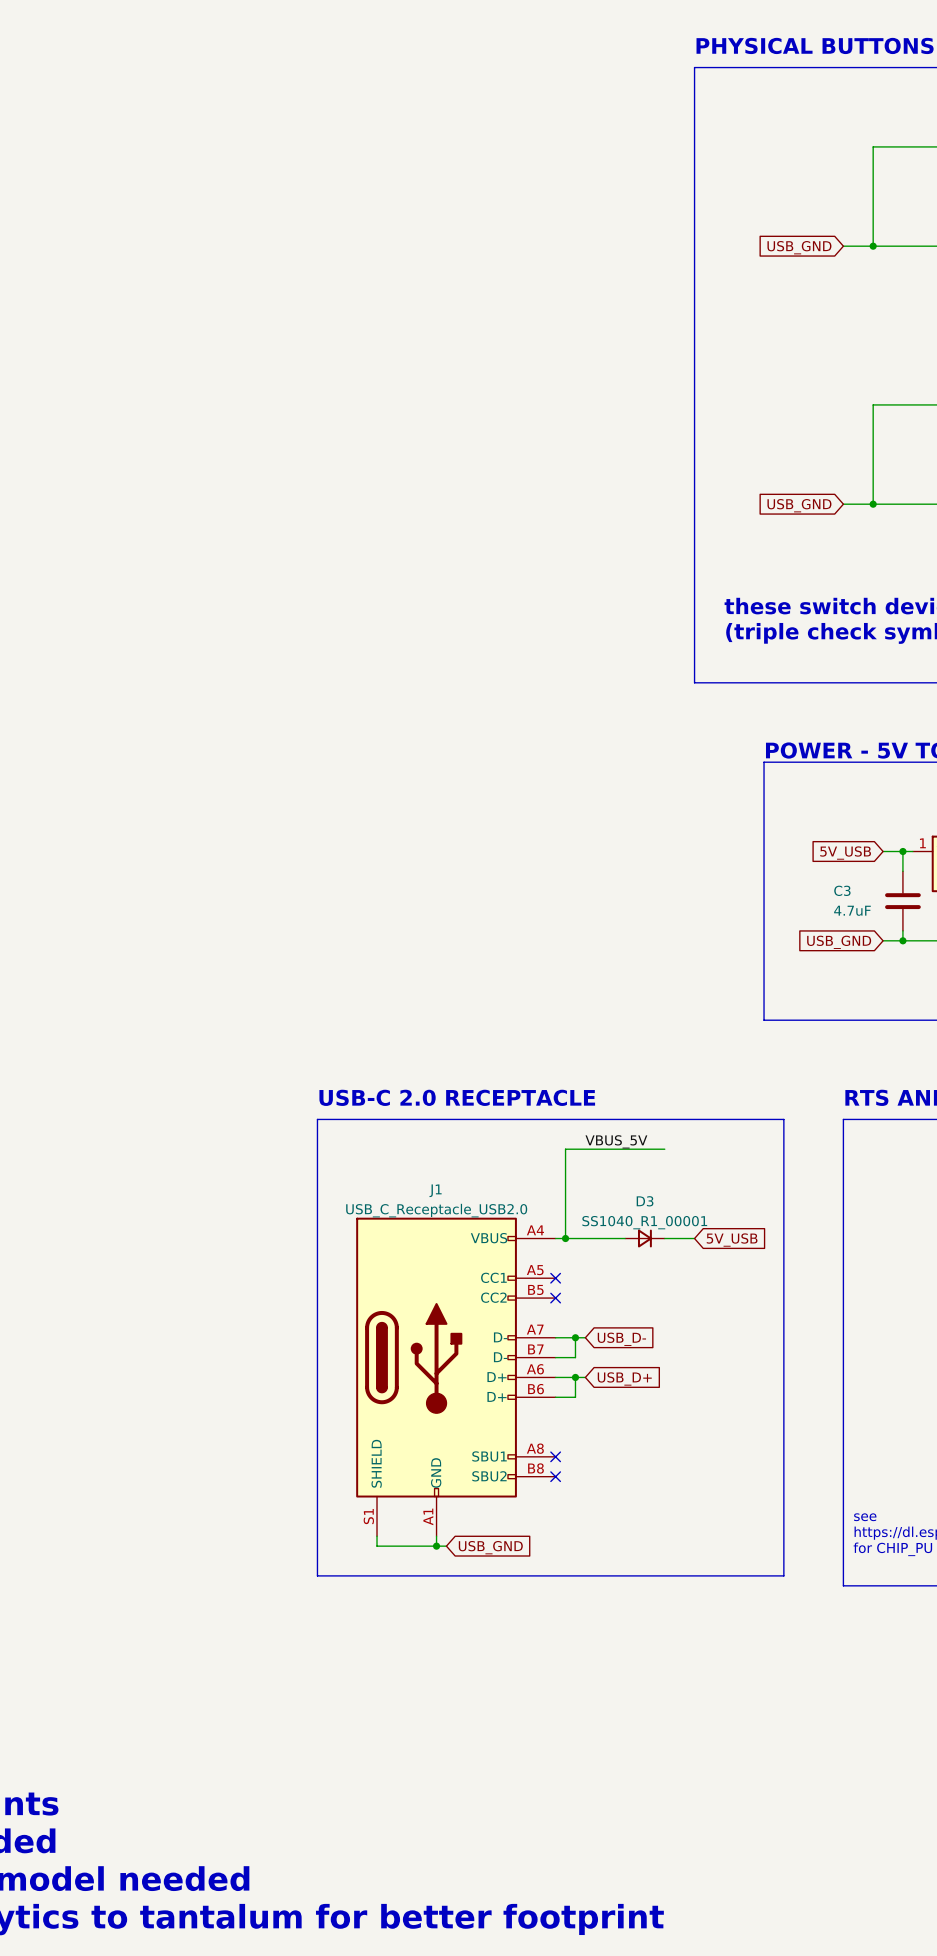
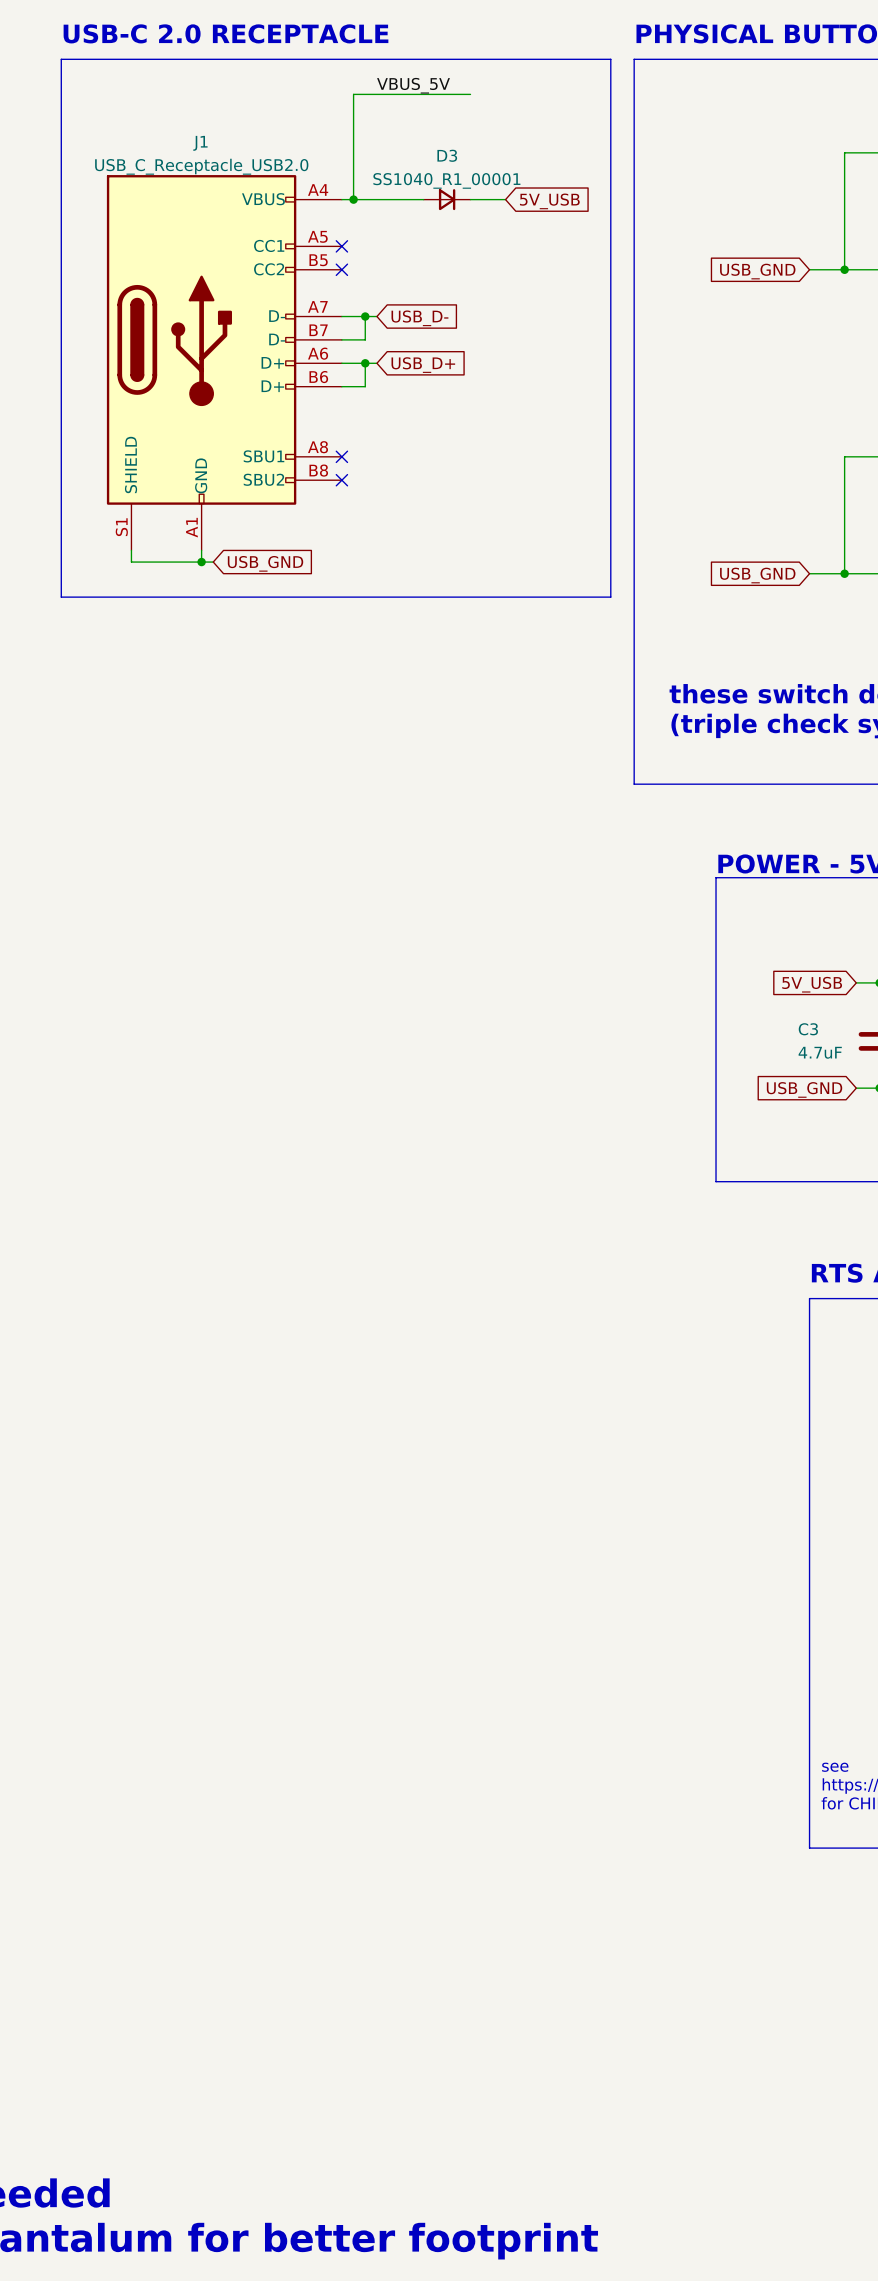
text: none -> USB-C 2.0 RECEPTACLE (225, 33)
line: none -> (61, 59) (610, 59) (610, 597) (61, 597) (61, 59)
label: none -> VBUS_5V (413, 85)
wire: none -> (470, 94) (353, 94) (353, 199)
wire: none -> (341, 199) (423, 199)
junction: none -> (353, 199)
wire: none -> (470, 199) (505, 199)
global label: none -> 5V_USB (549, 201)
no-connect mark: none -> (341, 246)
no-connect mark: none -> (341, 269)
wire: none -> (341, 316) (376, 316)
wire: none -> (365, 316) (365, 339) (341, 339)
junction: none -> (365, 316)
global label: none -> USB_D- (419, 318)
wire: none -> (341, 363) (376, 363)
wire: none -> (365, 363) (365, 386) (341, 386)
junction: none -> (365, 363)
global label: none -> USB_D+ (423, 365)
no-connect mark: none -> (341, 456)
no-connect mark: none -> (341, 480)
wire: none -> (131, 550) (131, 562) (213, 562)
wire: none -> (201, 550) (201, 562)
junction: none -> (201, 562)
global label: none -> USB_GND (265, 563)
text: USB-C 2.0 RECEPTACLE (457, 1097) -> none
line: (317, 1119) (783, 1119) (783, 1575) (317, 1575) (317, 1119) -> none
label: VBUS_5V (616, 1141) -> none
wire: (664, 1149) (565, 1149) (565, 1238) -> none
wire: (555, 1238) (625, 1238) -> none
junction: (565, 1238) -> none
D3 position: (644, 1238) -> (447, 199)
wire: (664, 1238) (694, 1238) -> none
global label: 5V_USB (732, 1240) -> none
no-connect mark: (555, 1278) -> none
no-connect mark: (555, 1298) -> none
wire: (555, 1337) (585, 1337) -> none
wire: (575, 1337) (575, 1357) (555, 1357) -> none
junction: (575, 1337) -> none
global label: USB_D- (621, 1339) -> none
J1 position: (455, 1376) -> (224, 362)
wire: (555, 1377) (585, 1377) -> none
wire: (575, 1377) (575, 1397) (555, 1397) -> none
junction: (575, 1377) -> none
global label: USB_D+ (624, 1378) -> none
no-connect mark: (555, 1456) -> none
no-connect mark: (555, 1476) -> none
wire: (377, 1536) (377, 1546) (446, 1546) -> none
wire: (436, 1536) (436, 1546) -> none
junction: (436, 1546) -> none
global label: USB_GND (490, 1547) -> none

